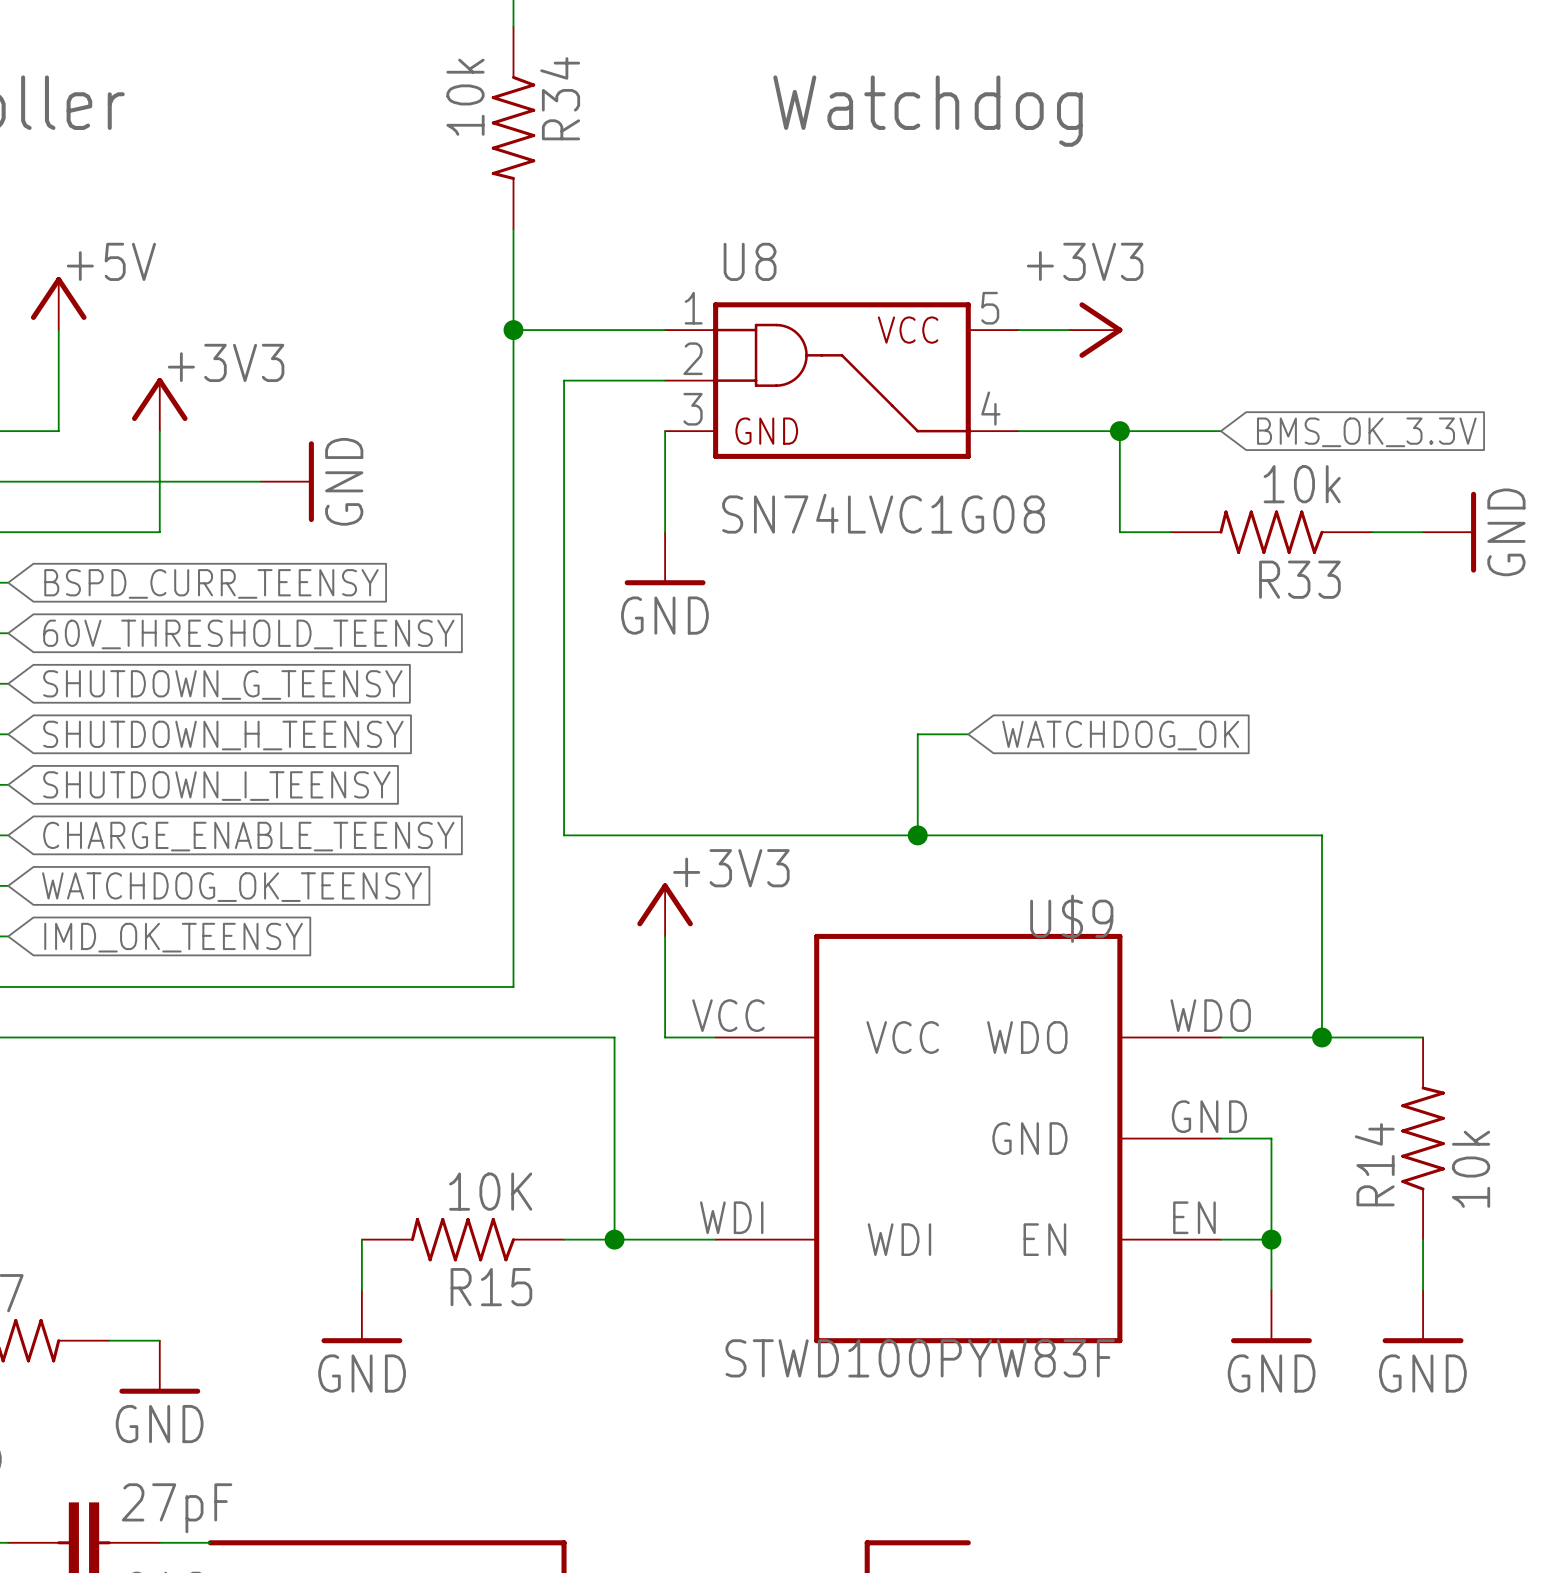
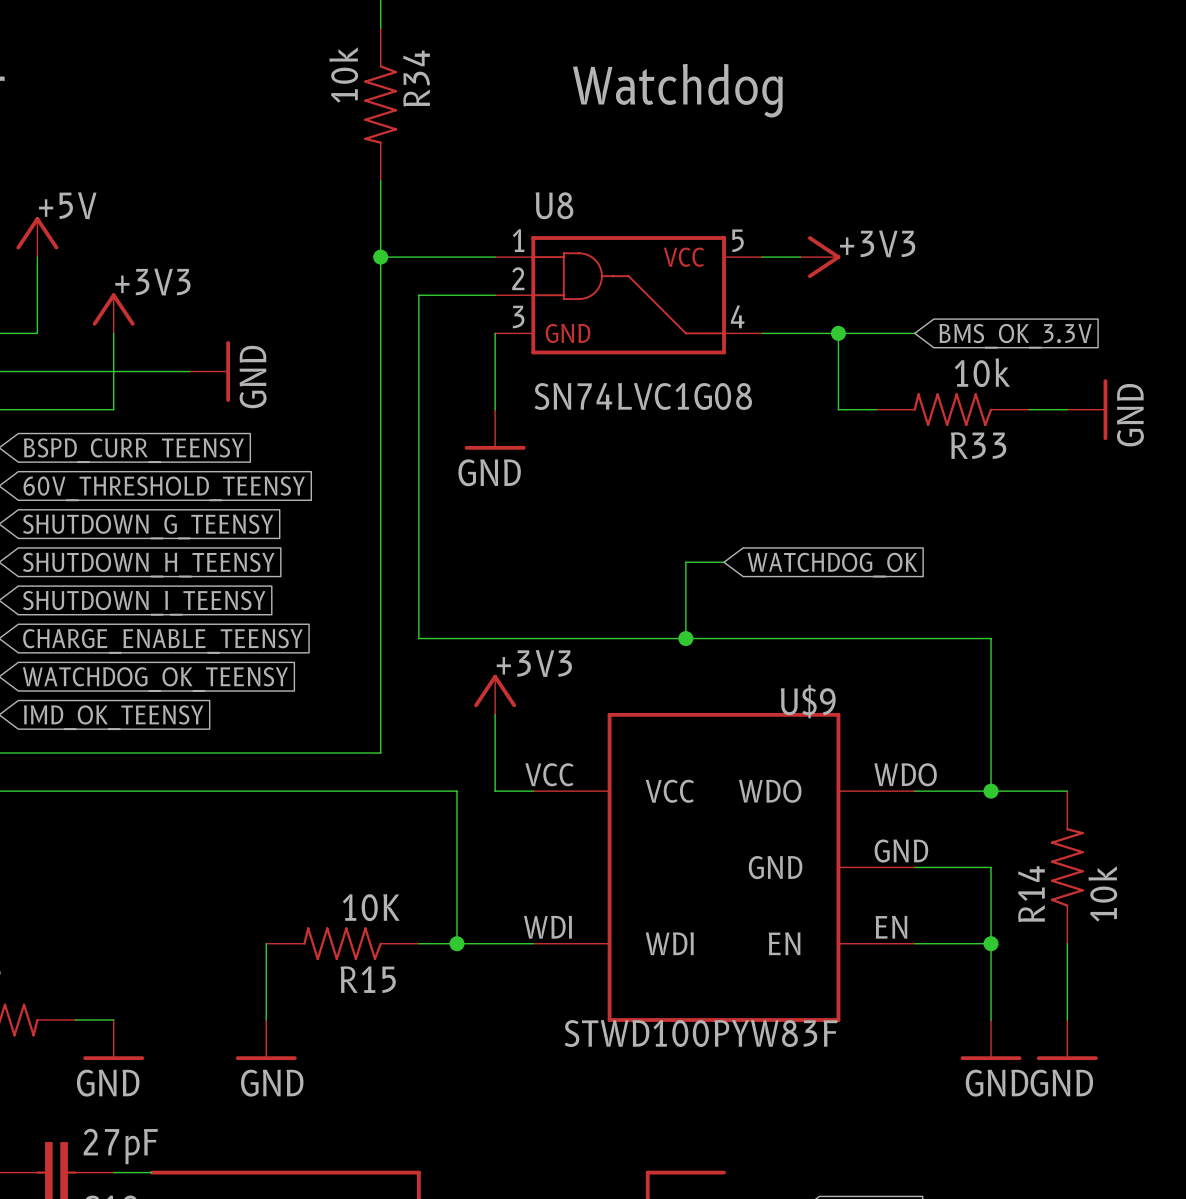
power symbol text position: +3V3 (1085, 261) -> +3V3 (877, 243)
wire: (1271, 1138) (1271, 1290) -> (952, 867) (991, 867) (991, 1020)
wire: none -> (952, 943) (991, 943)
junction position: (1271, 1239) -> (991, 943)
power symbol position: GND (361, 1316) -> GND (266, 1040)
power symbol: GND (1271, 1316) -> none
power symbol position: GND (1423, 1316) -> GND (1067, 1040)
power symbol: none -> GND (991, 1040)

